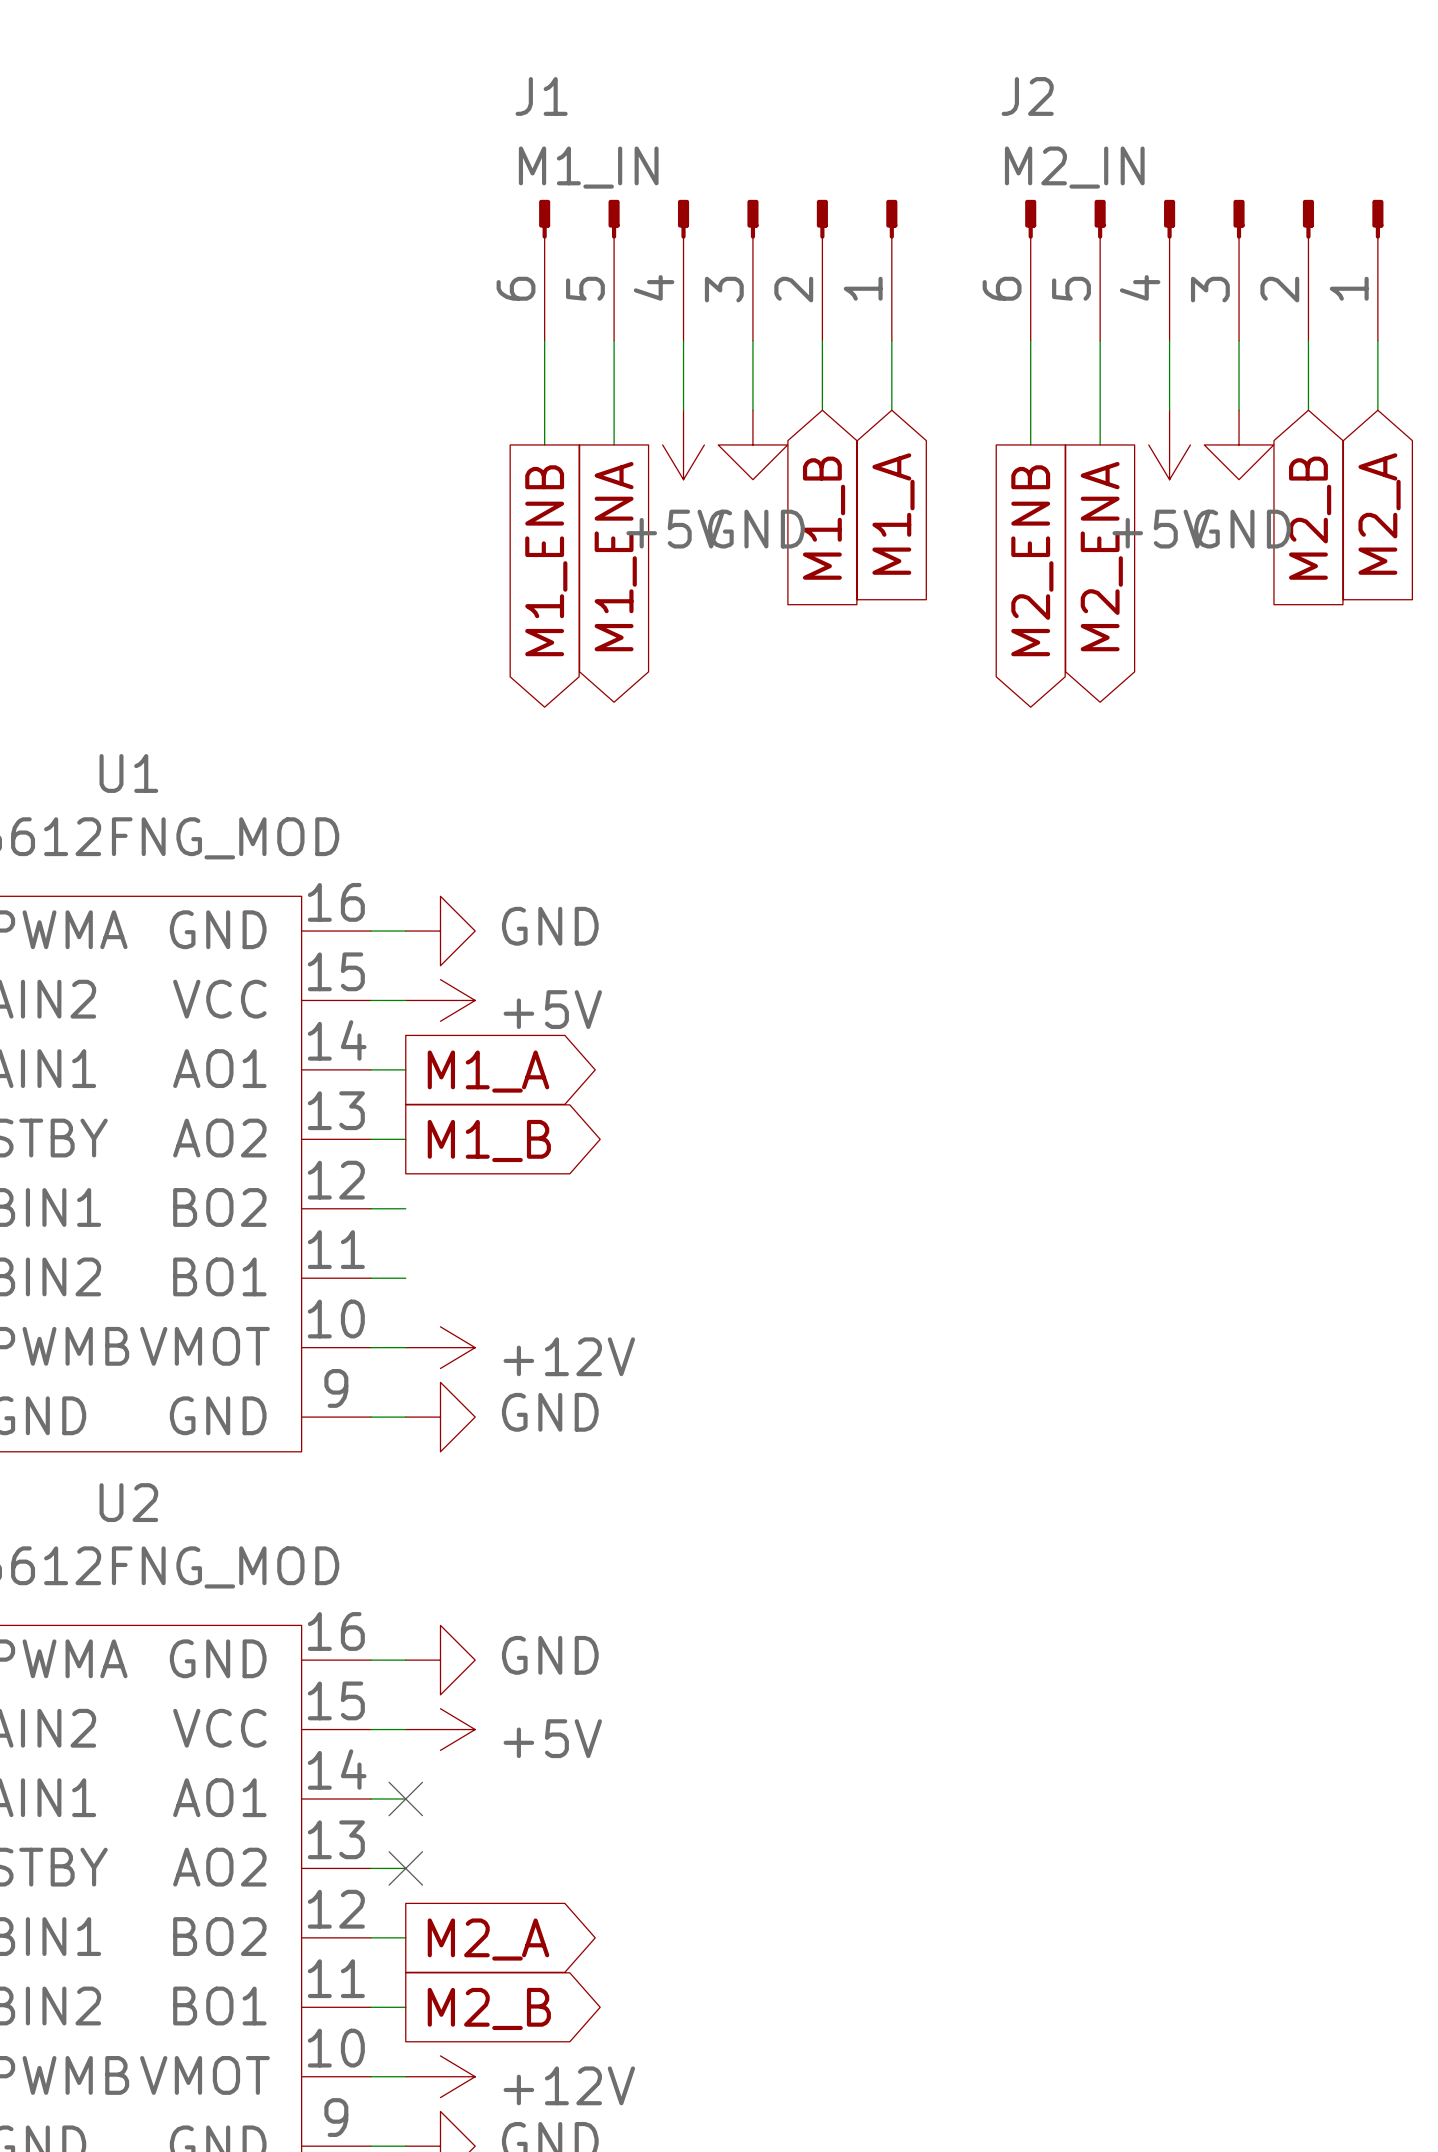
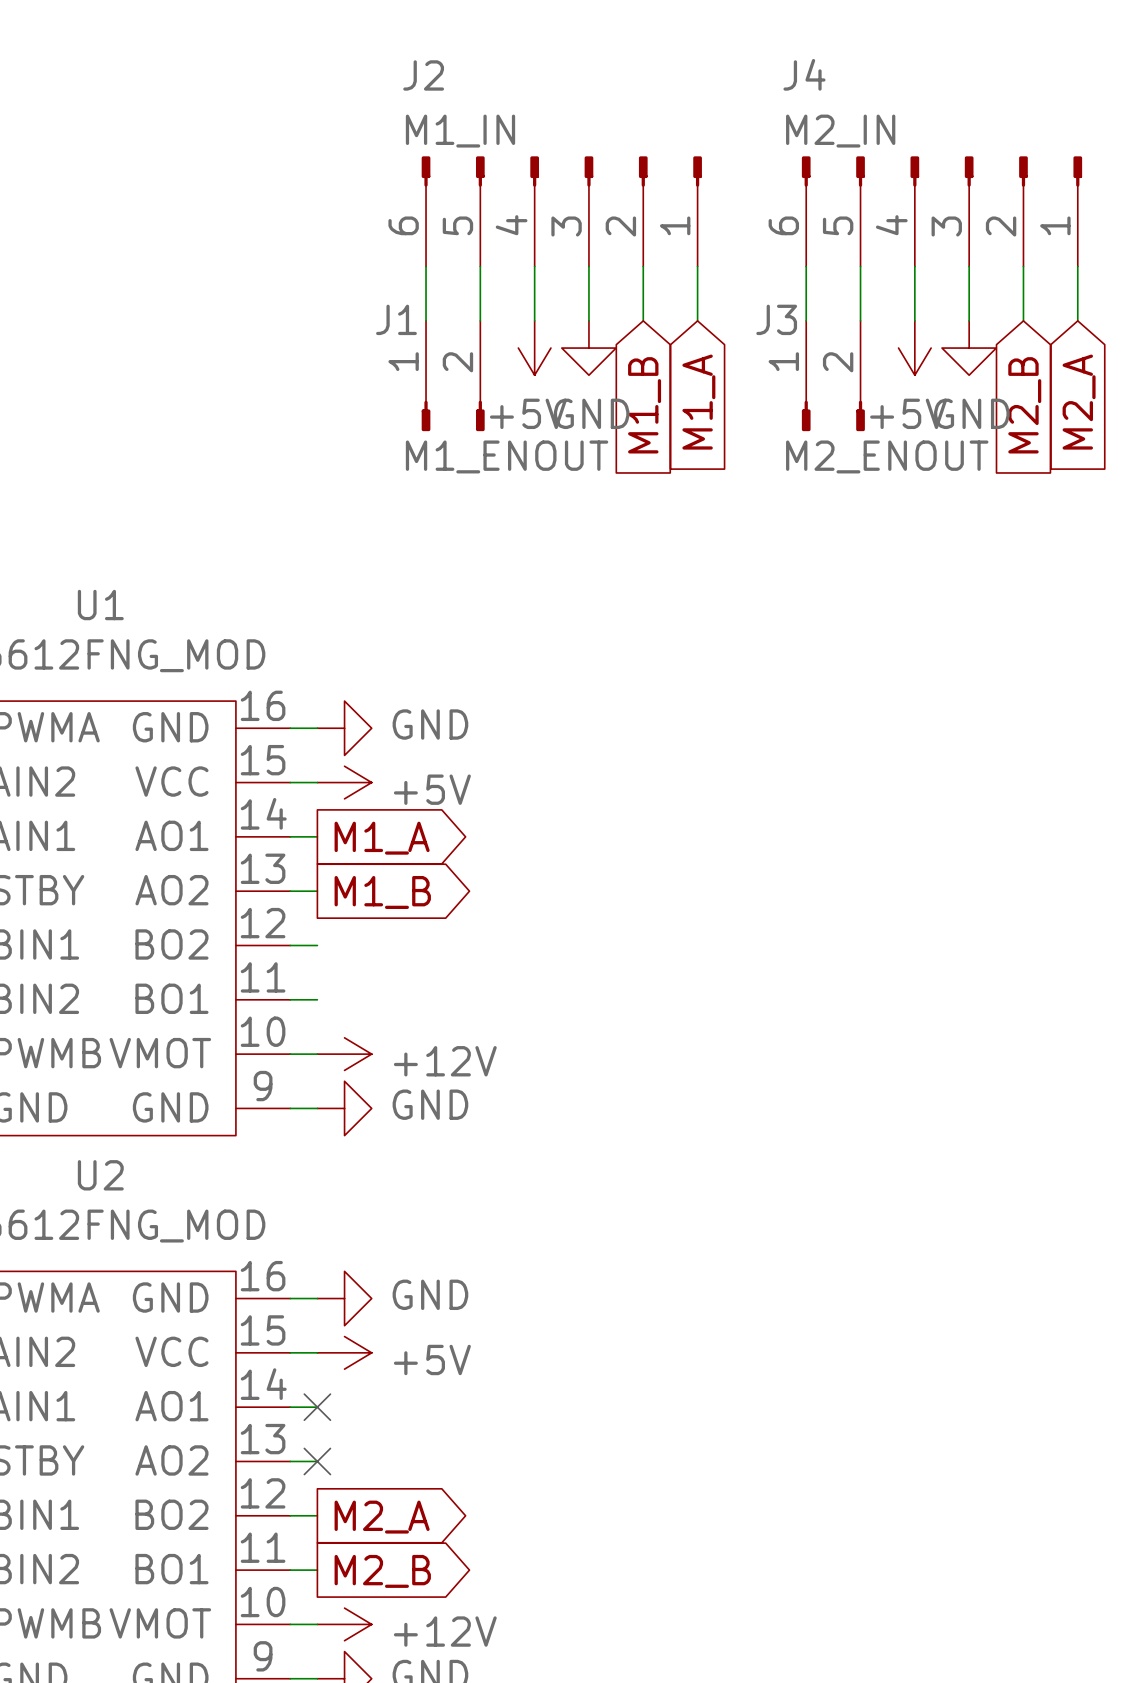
J1 name: J1 (541, 96) -> J2 (423, 75)
J2 name: J2 (1027, 96) -> J4 (804, 74)
J1: none -> M1_ENOUT (453, 376)
J3: none -> M2_ENOUT (833, 376)
global label: M1_ENA (615, 556) -> none
global label: M2_ENA (1101, 556) -> none
global label: M1_ENB (546, 560) -> none
global label: M2_ENB (1032, 560) -> none

